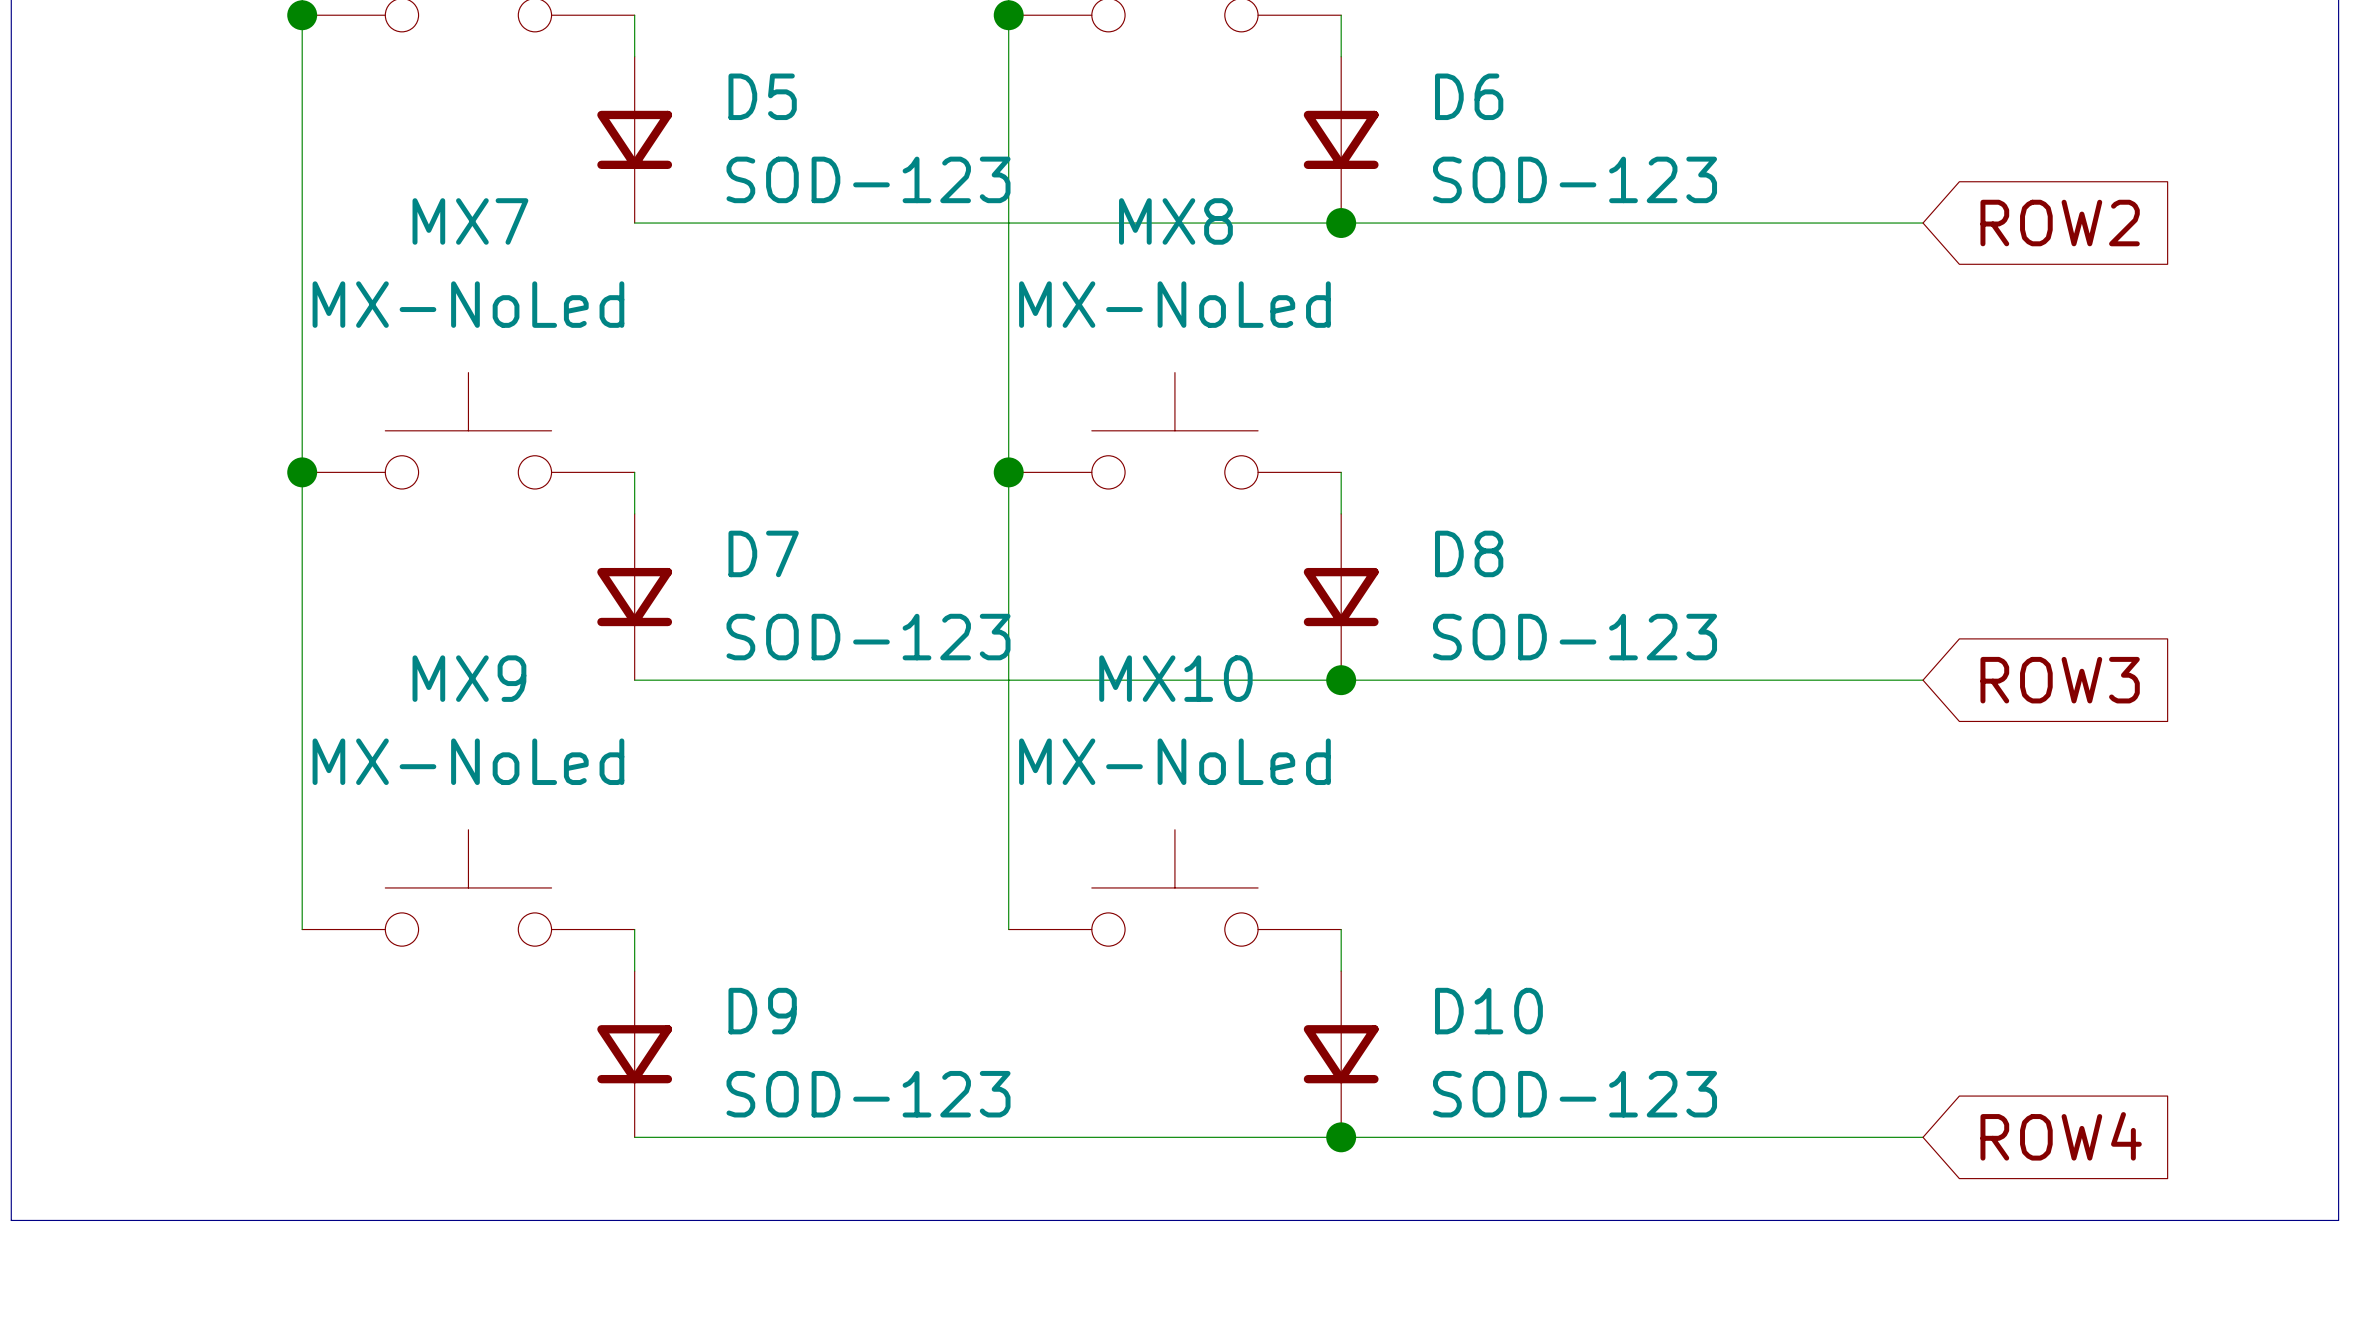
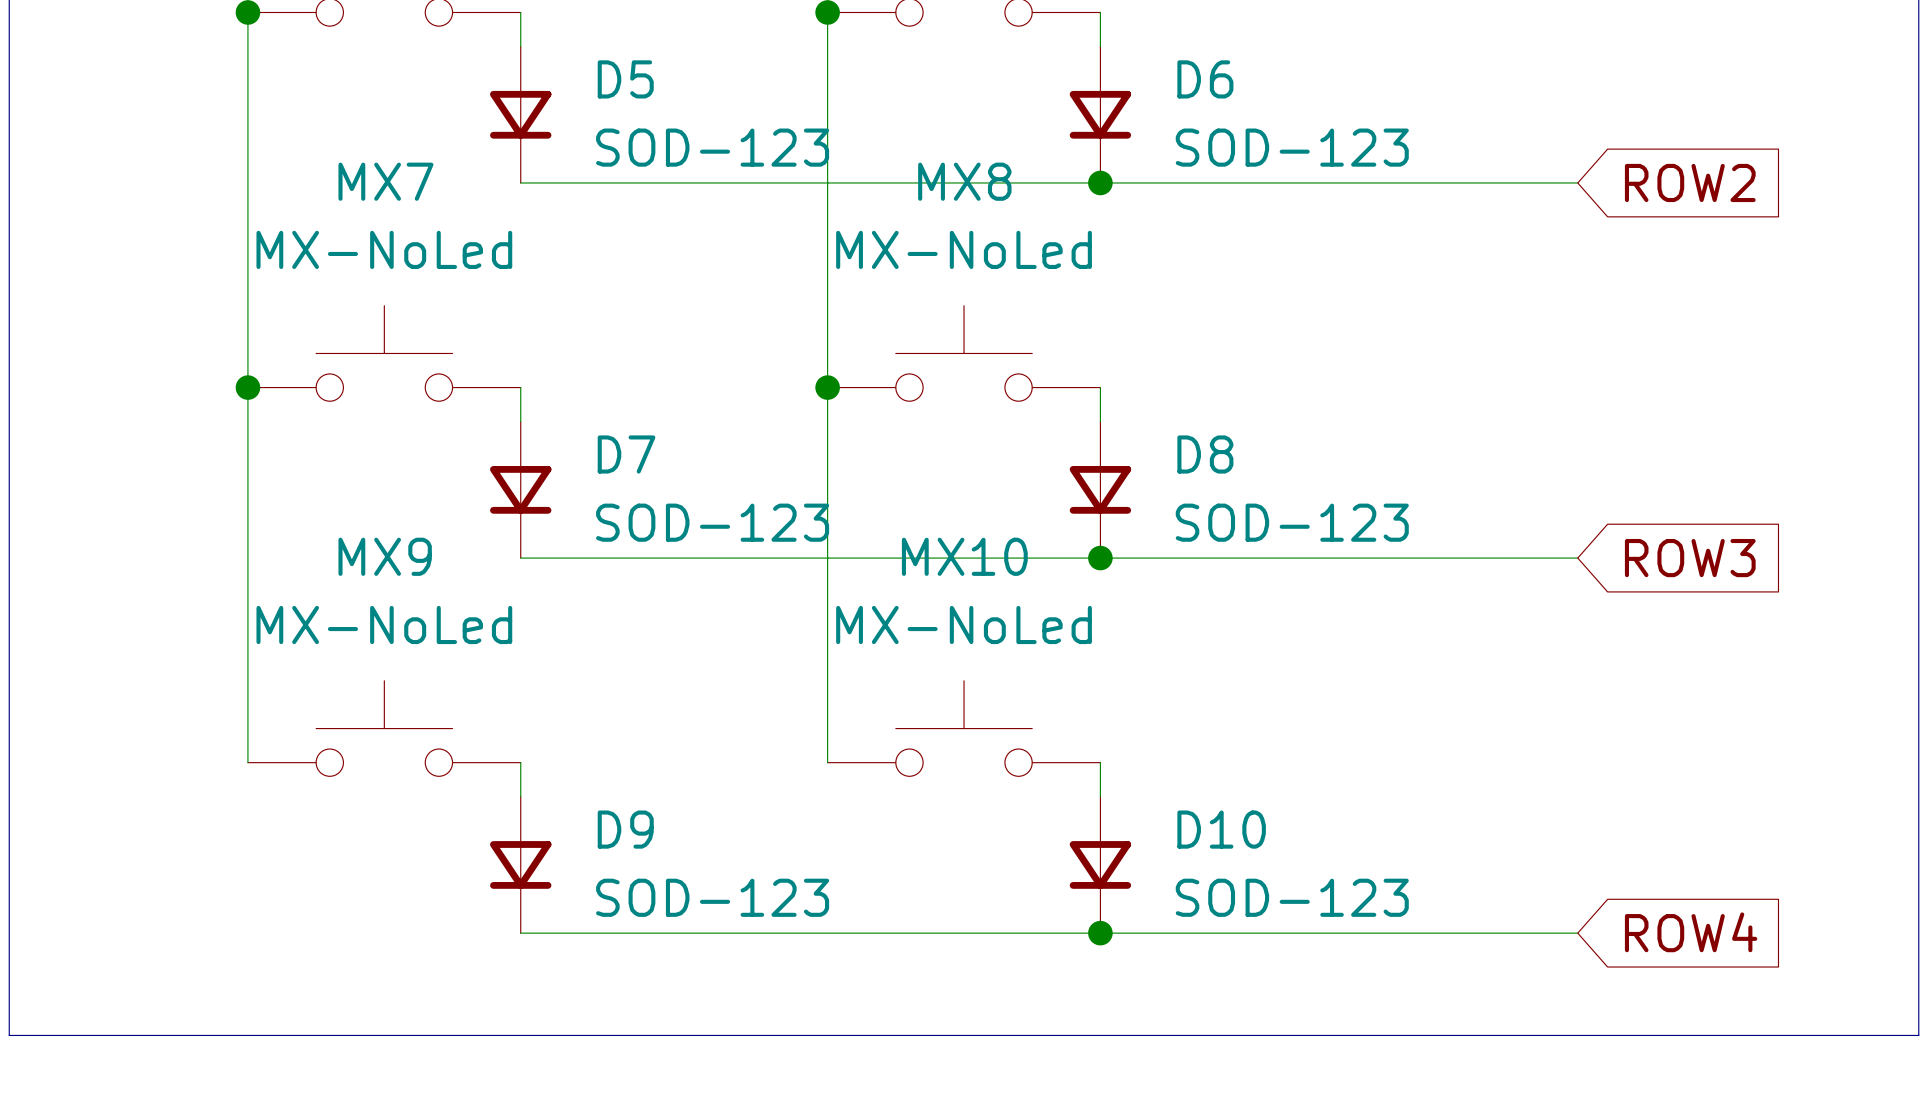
line: (11, 1220) (2338, 1220) -> (9, 1001) (9, 1035) (1918, 1035) (1918, 1001)

